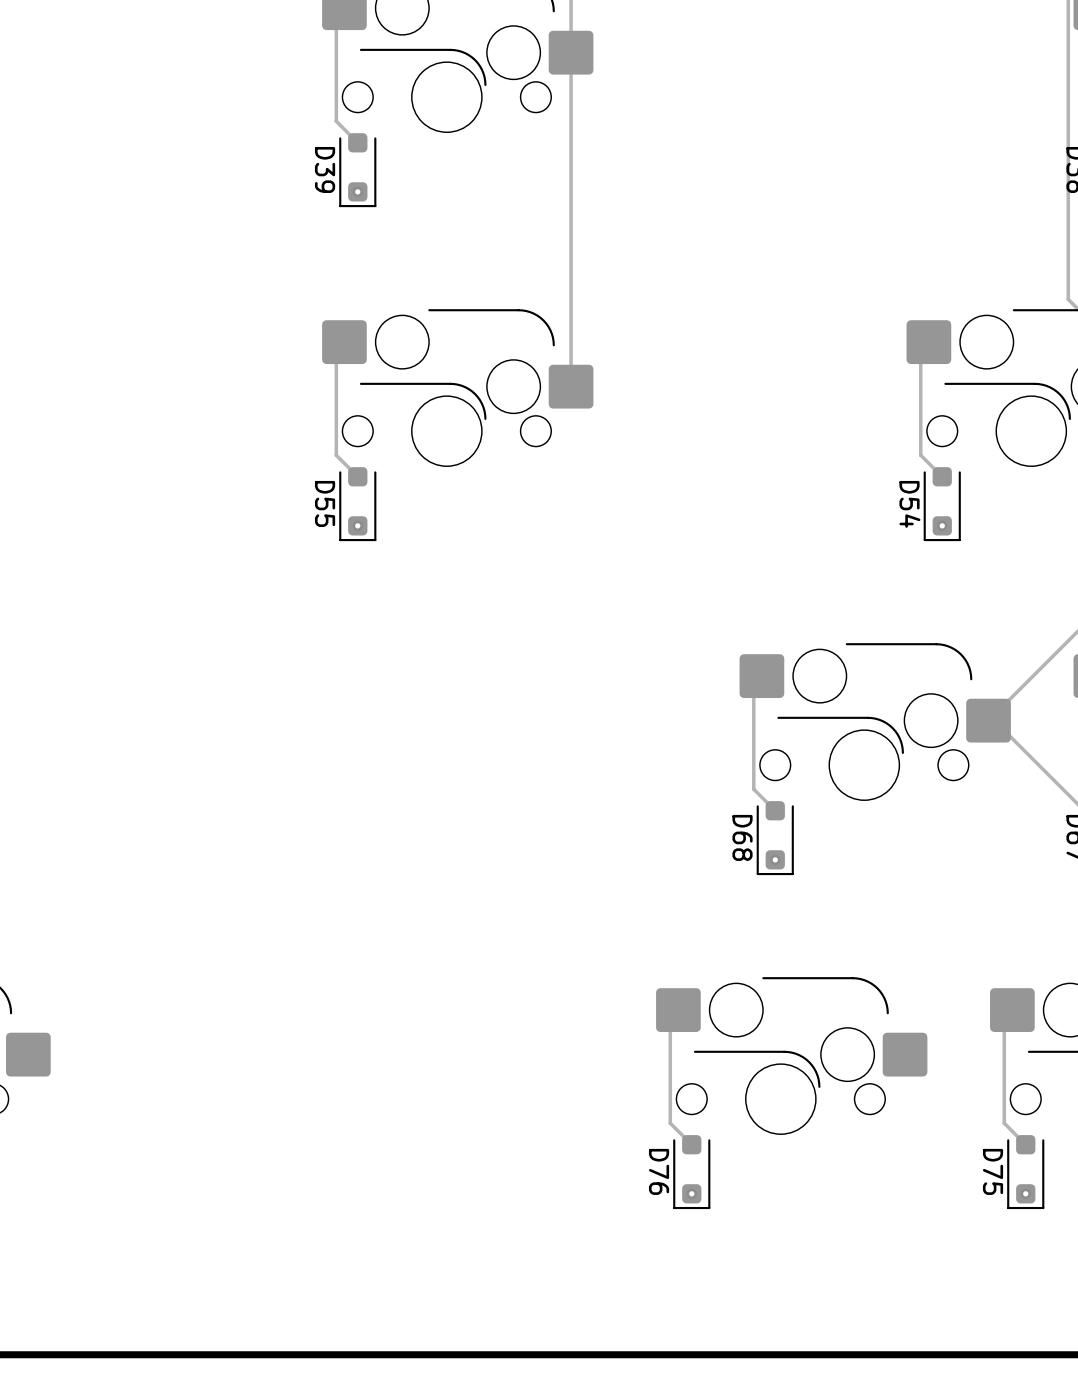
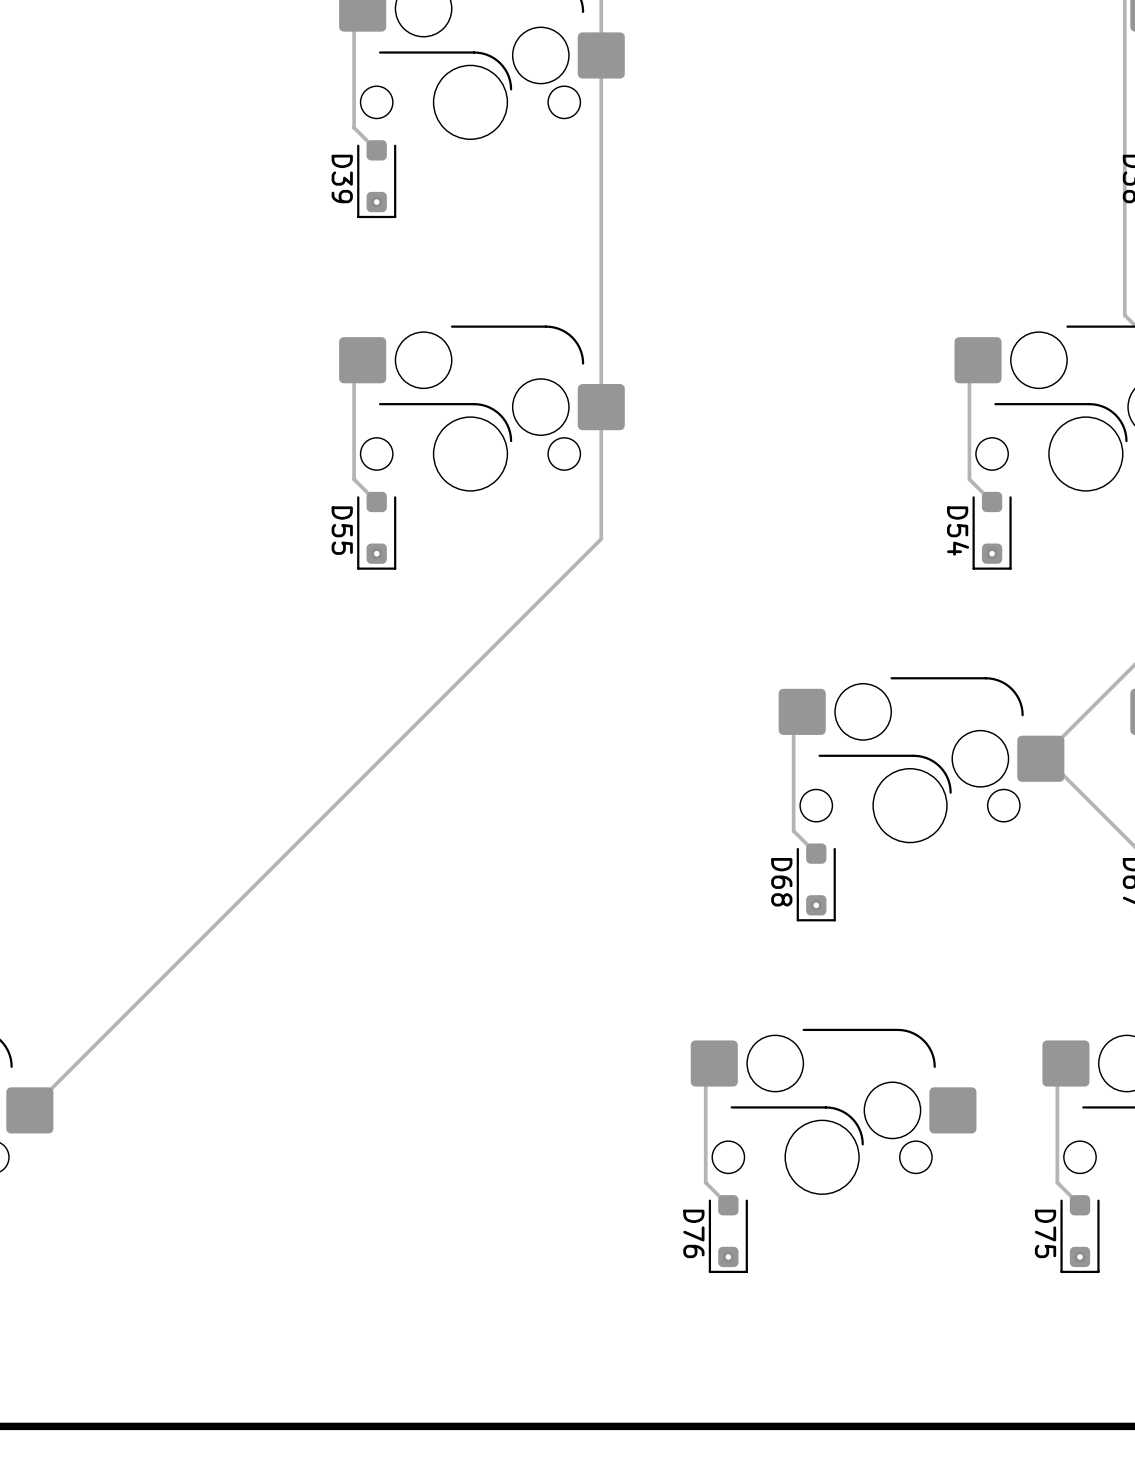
track: none -> (601, 407) (601, 538) (29, 1110)

